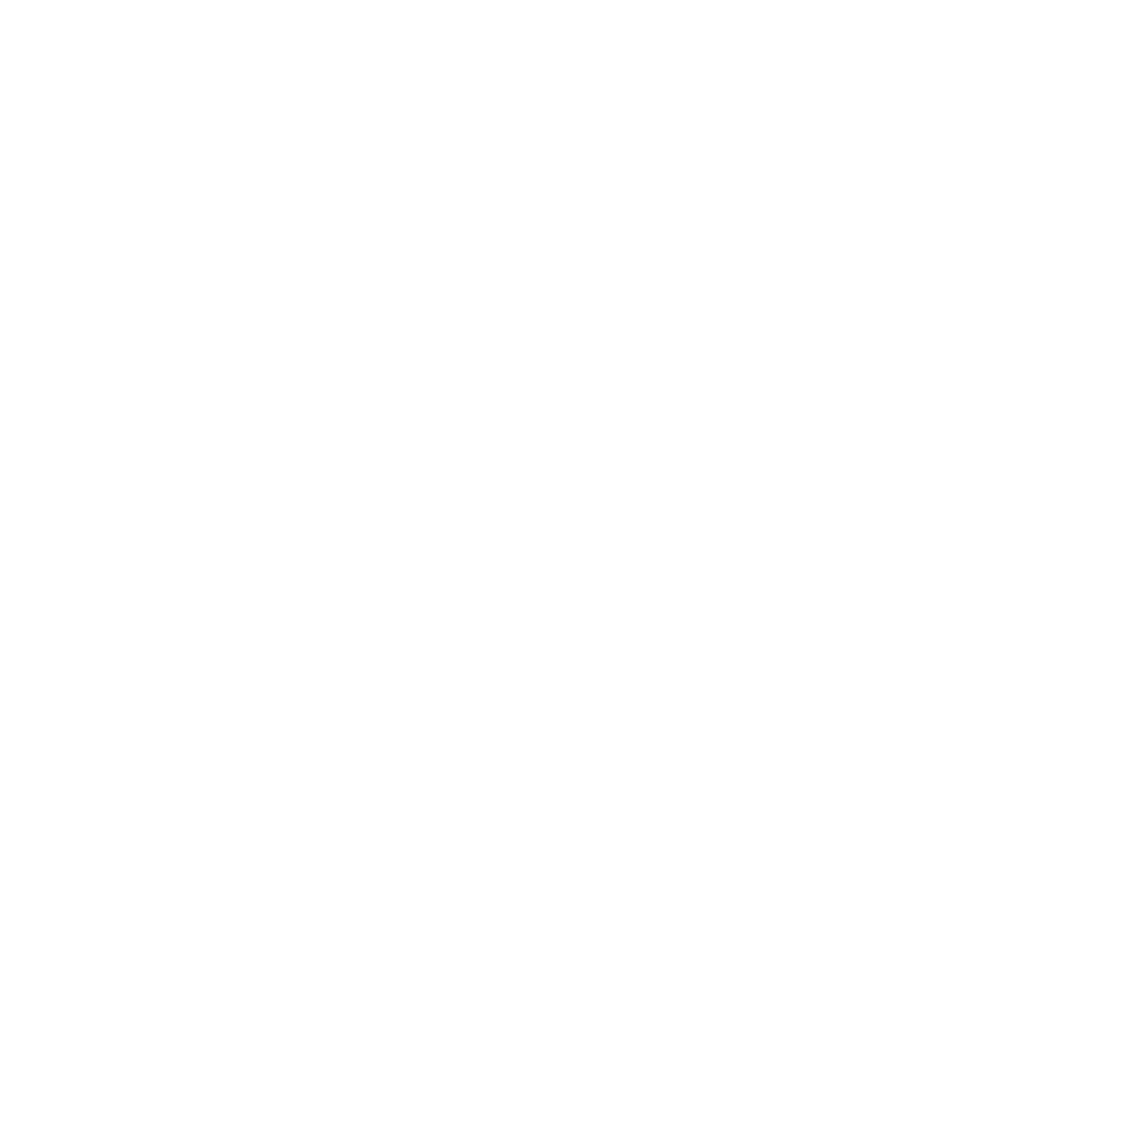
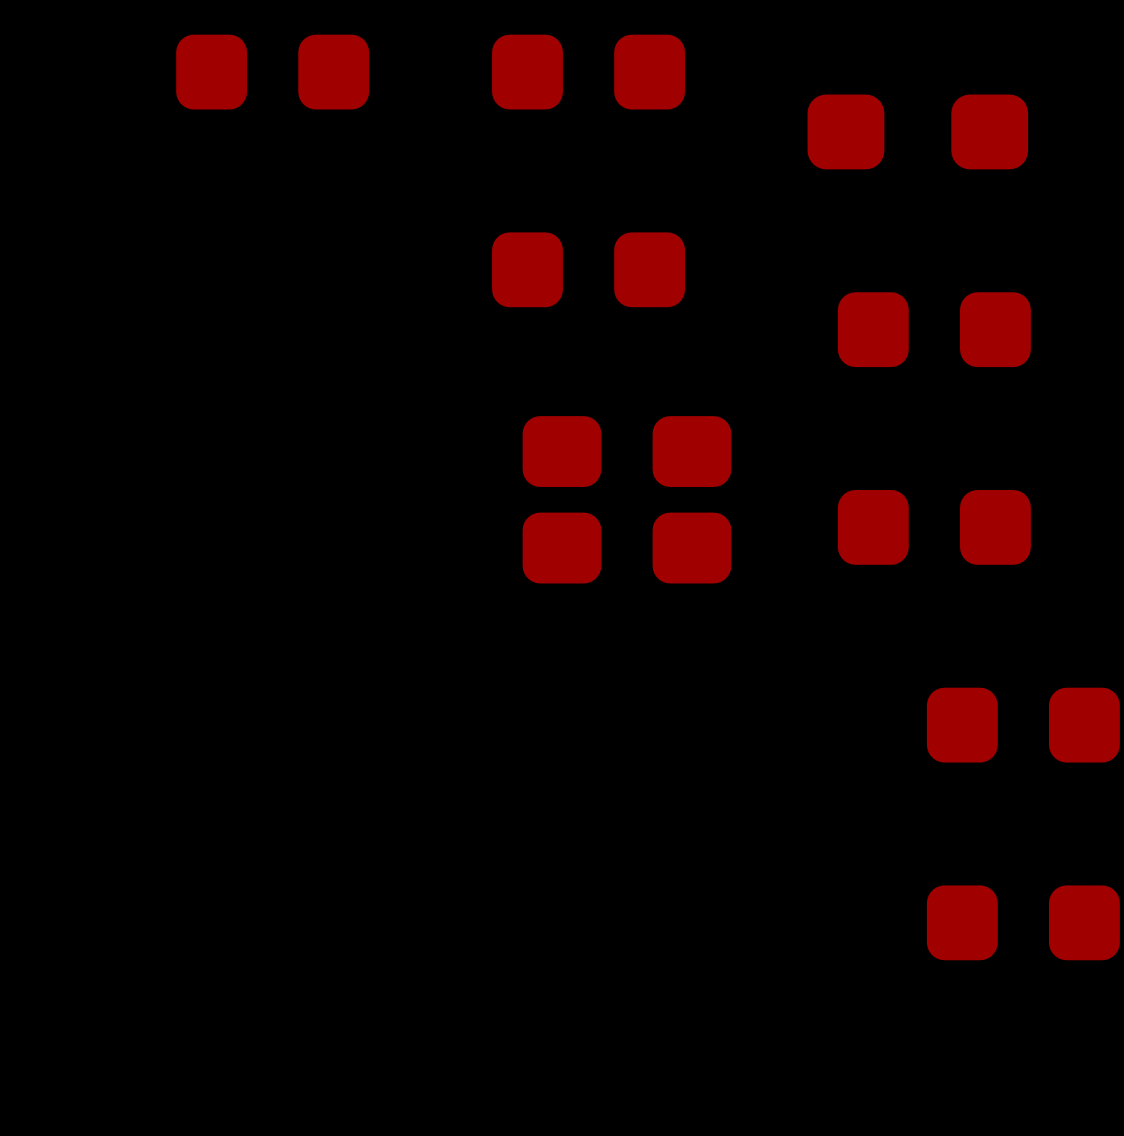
part: none -> (272, 72)
part: none -> (588, 72)
part: none -> (917, 131)
part: none -> (588, 269)
part: none -> (934, 329)
part: none -> (626, 499)
part: none -> (934, 527)
part: none -> (1023, 725)
part: none -> (1023, 922)

